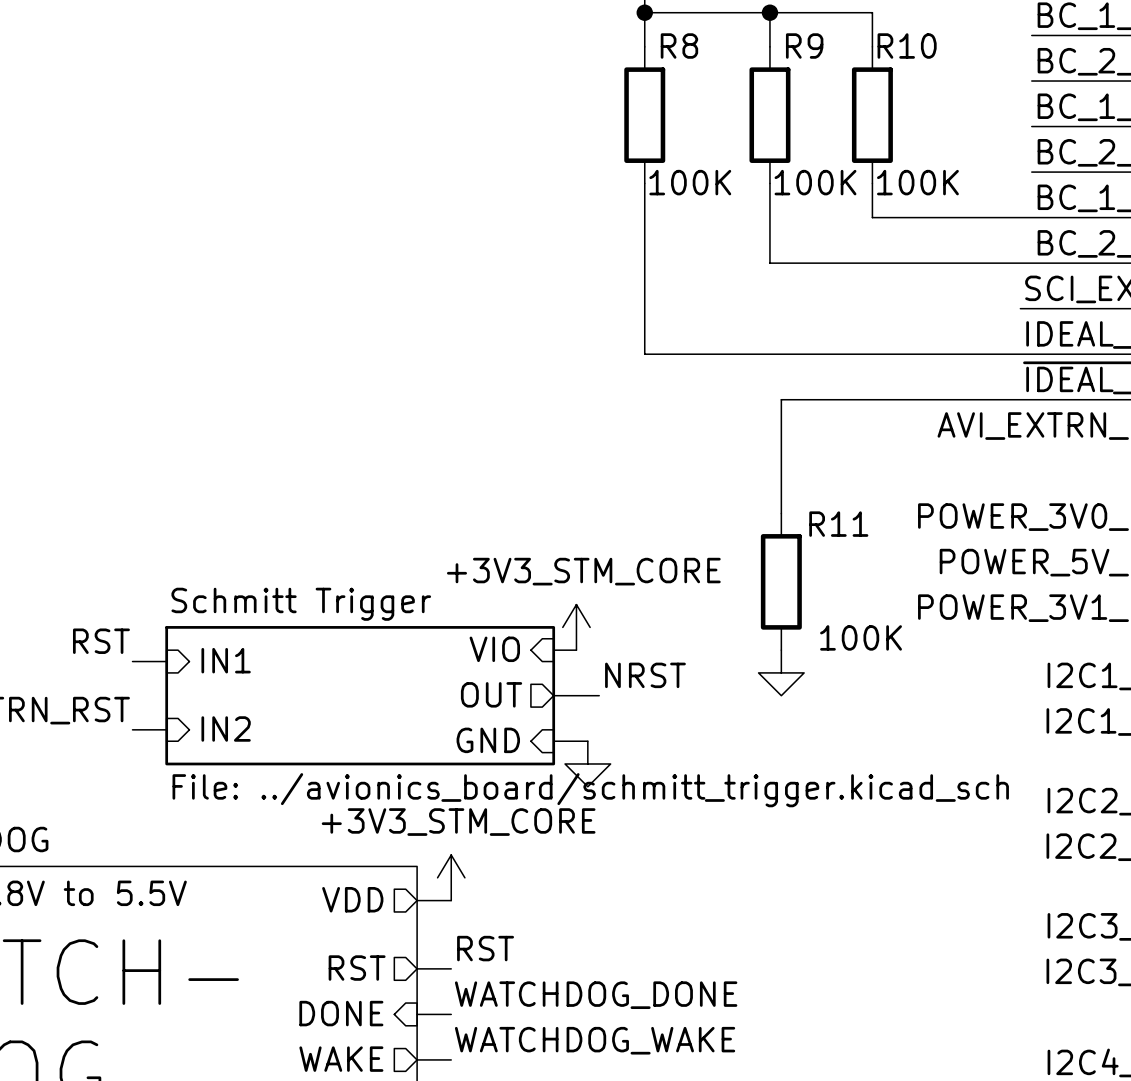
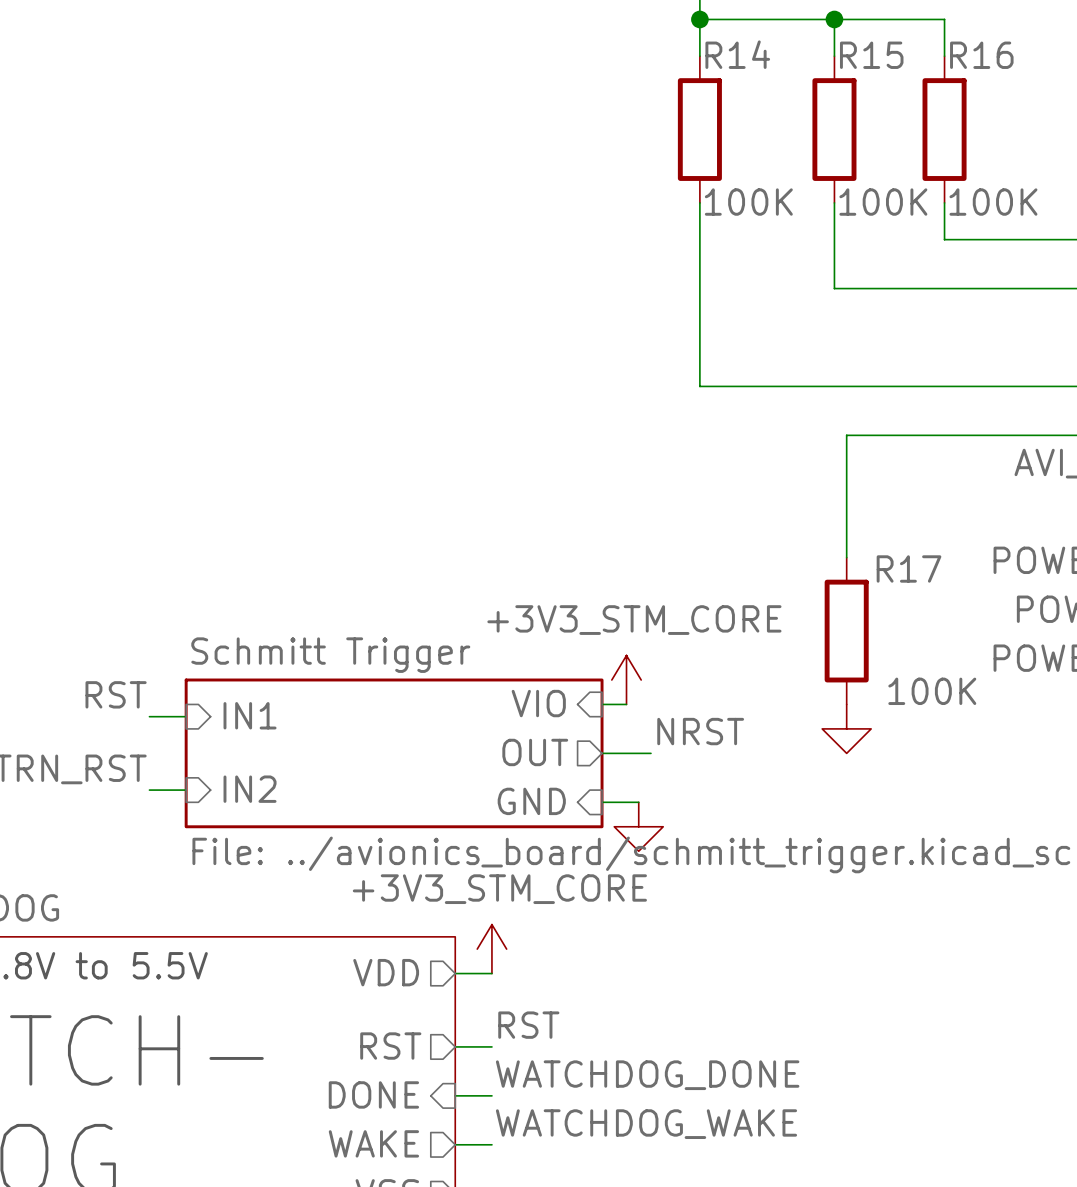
R8 name: R8 (679, 46) -> R14 (737, 54)
R9 name: R9 (804, 46) -> R15 (871, 55)
R10 name: R10 (907, 46) -> R16 (981, 55)
R11 name: R11 (838, 524) -> R17 (909, 568)

